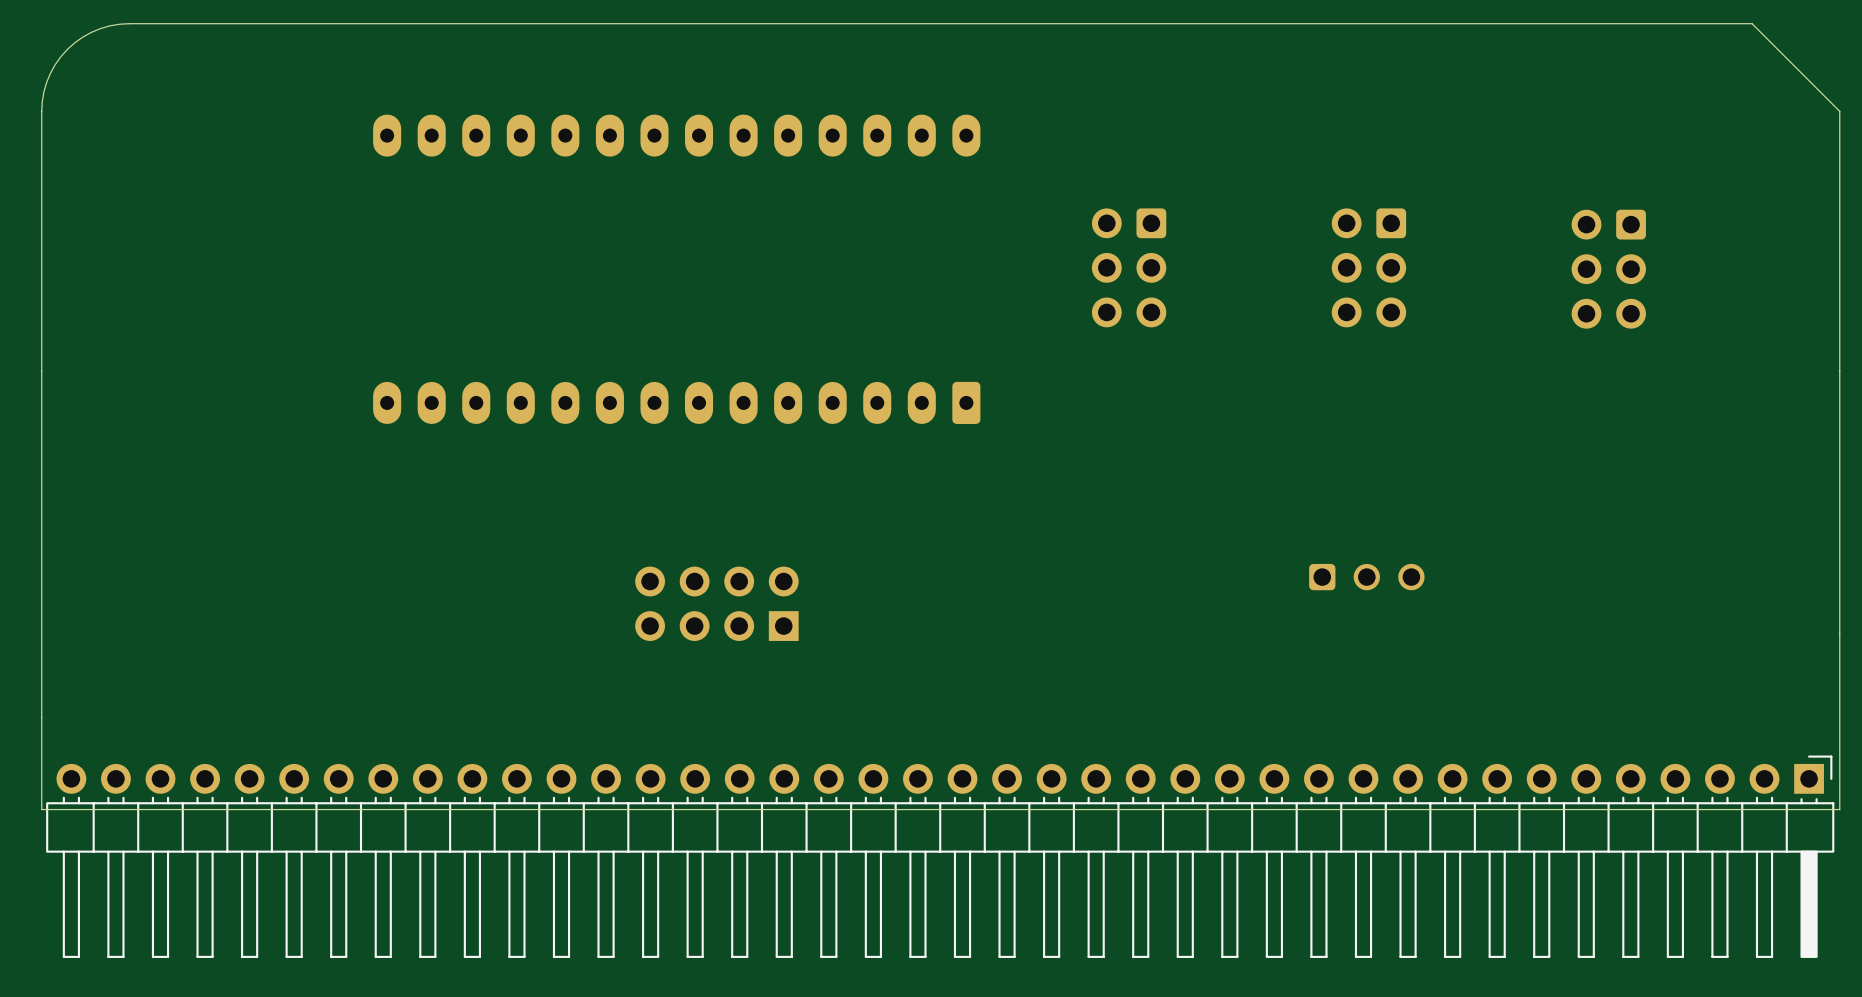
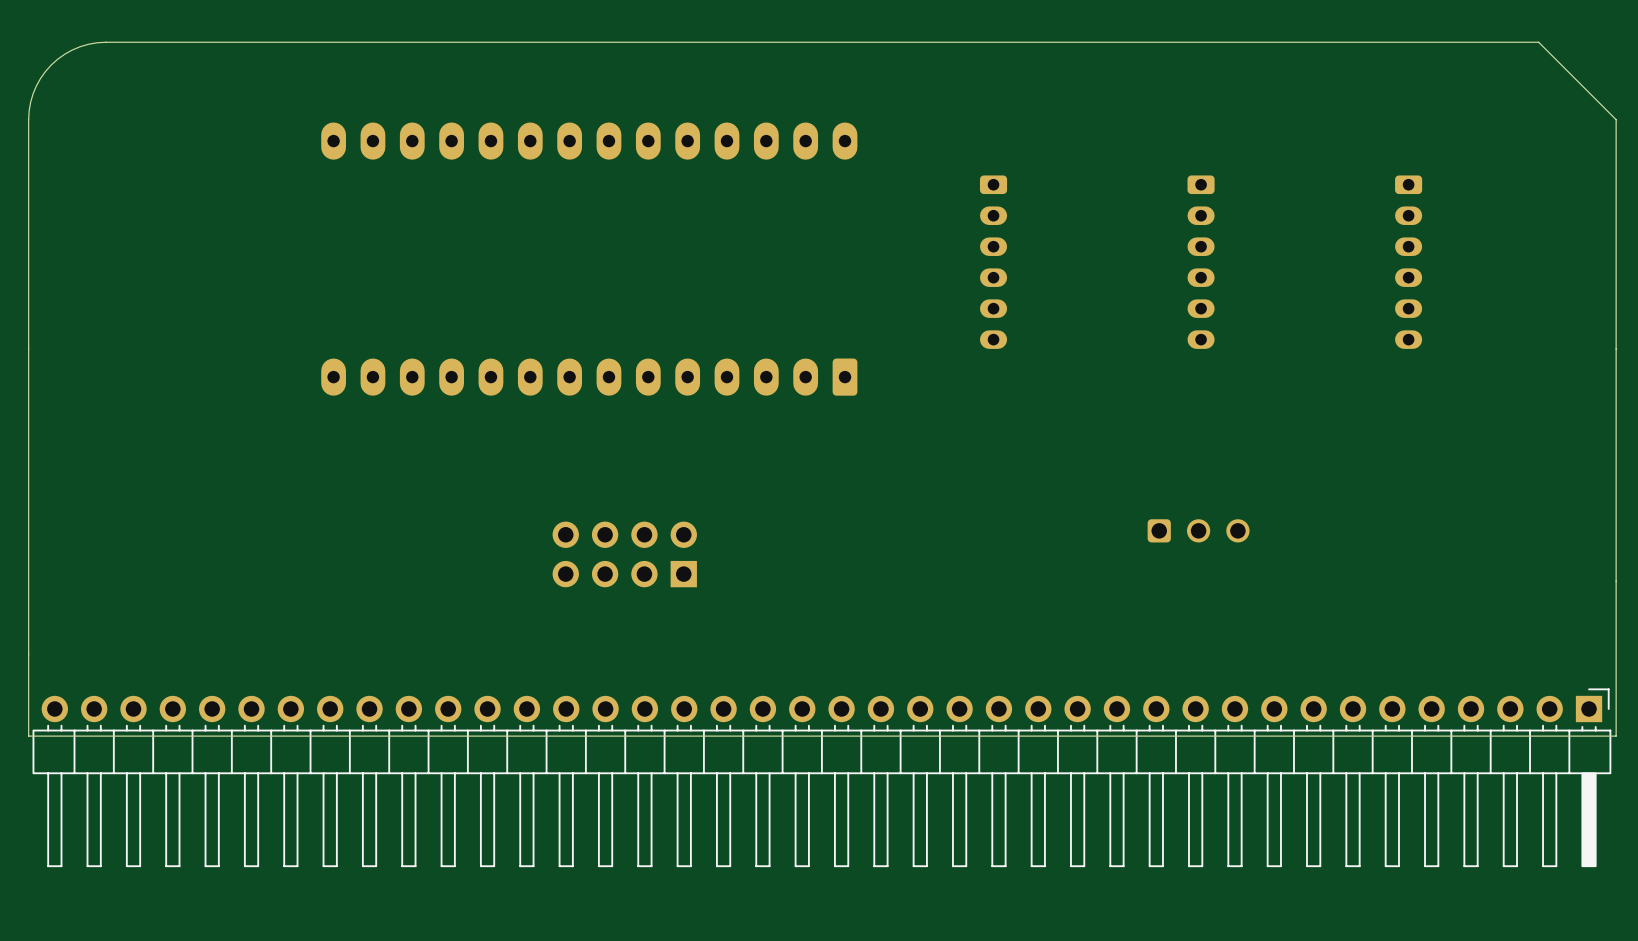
part footprint: [1091, 208, 1167, 328] -> [979, 175, 1008, 349]
part footprint: [1331, 208, 1407, 328] -> [1187, 175, 1215, 349]
part footprint: [1571, 209, 1646, 329] -> [1395, 175, 1423, 349]

